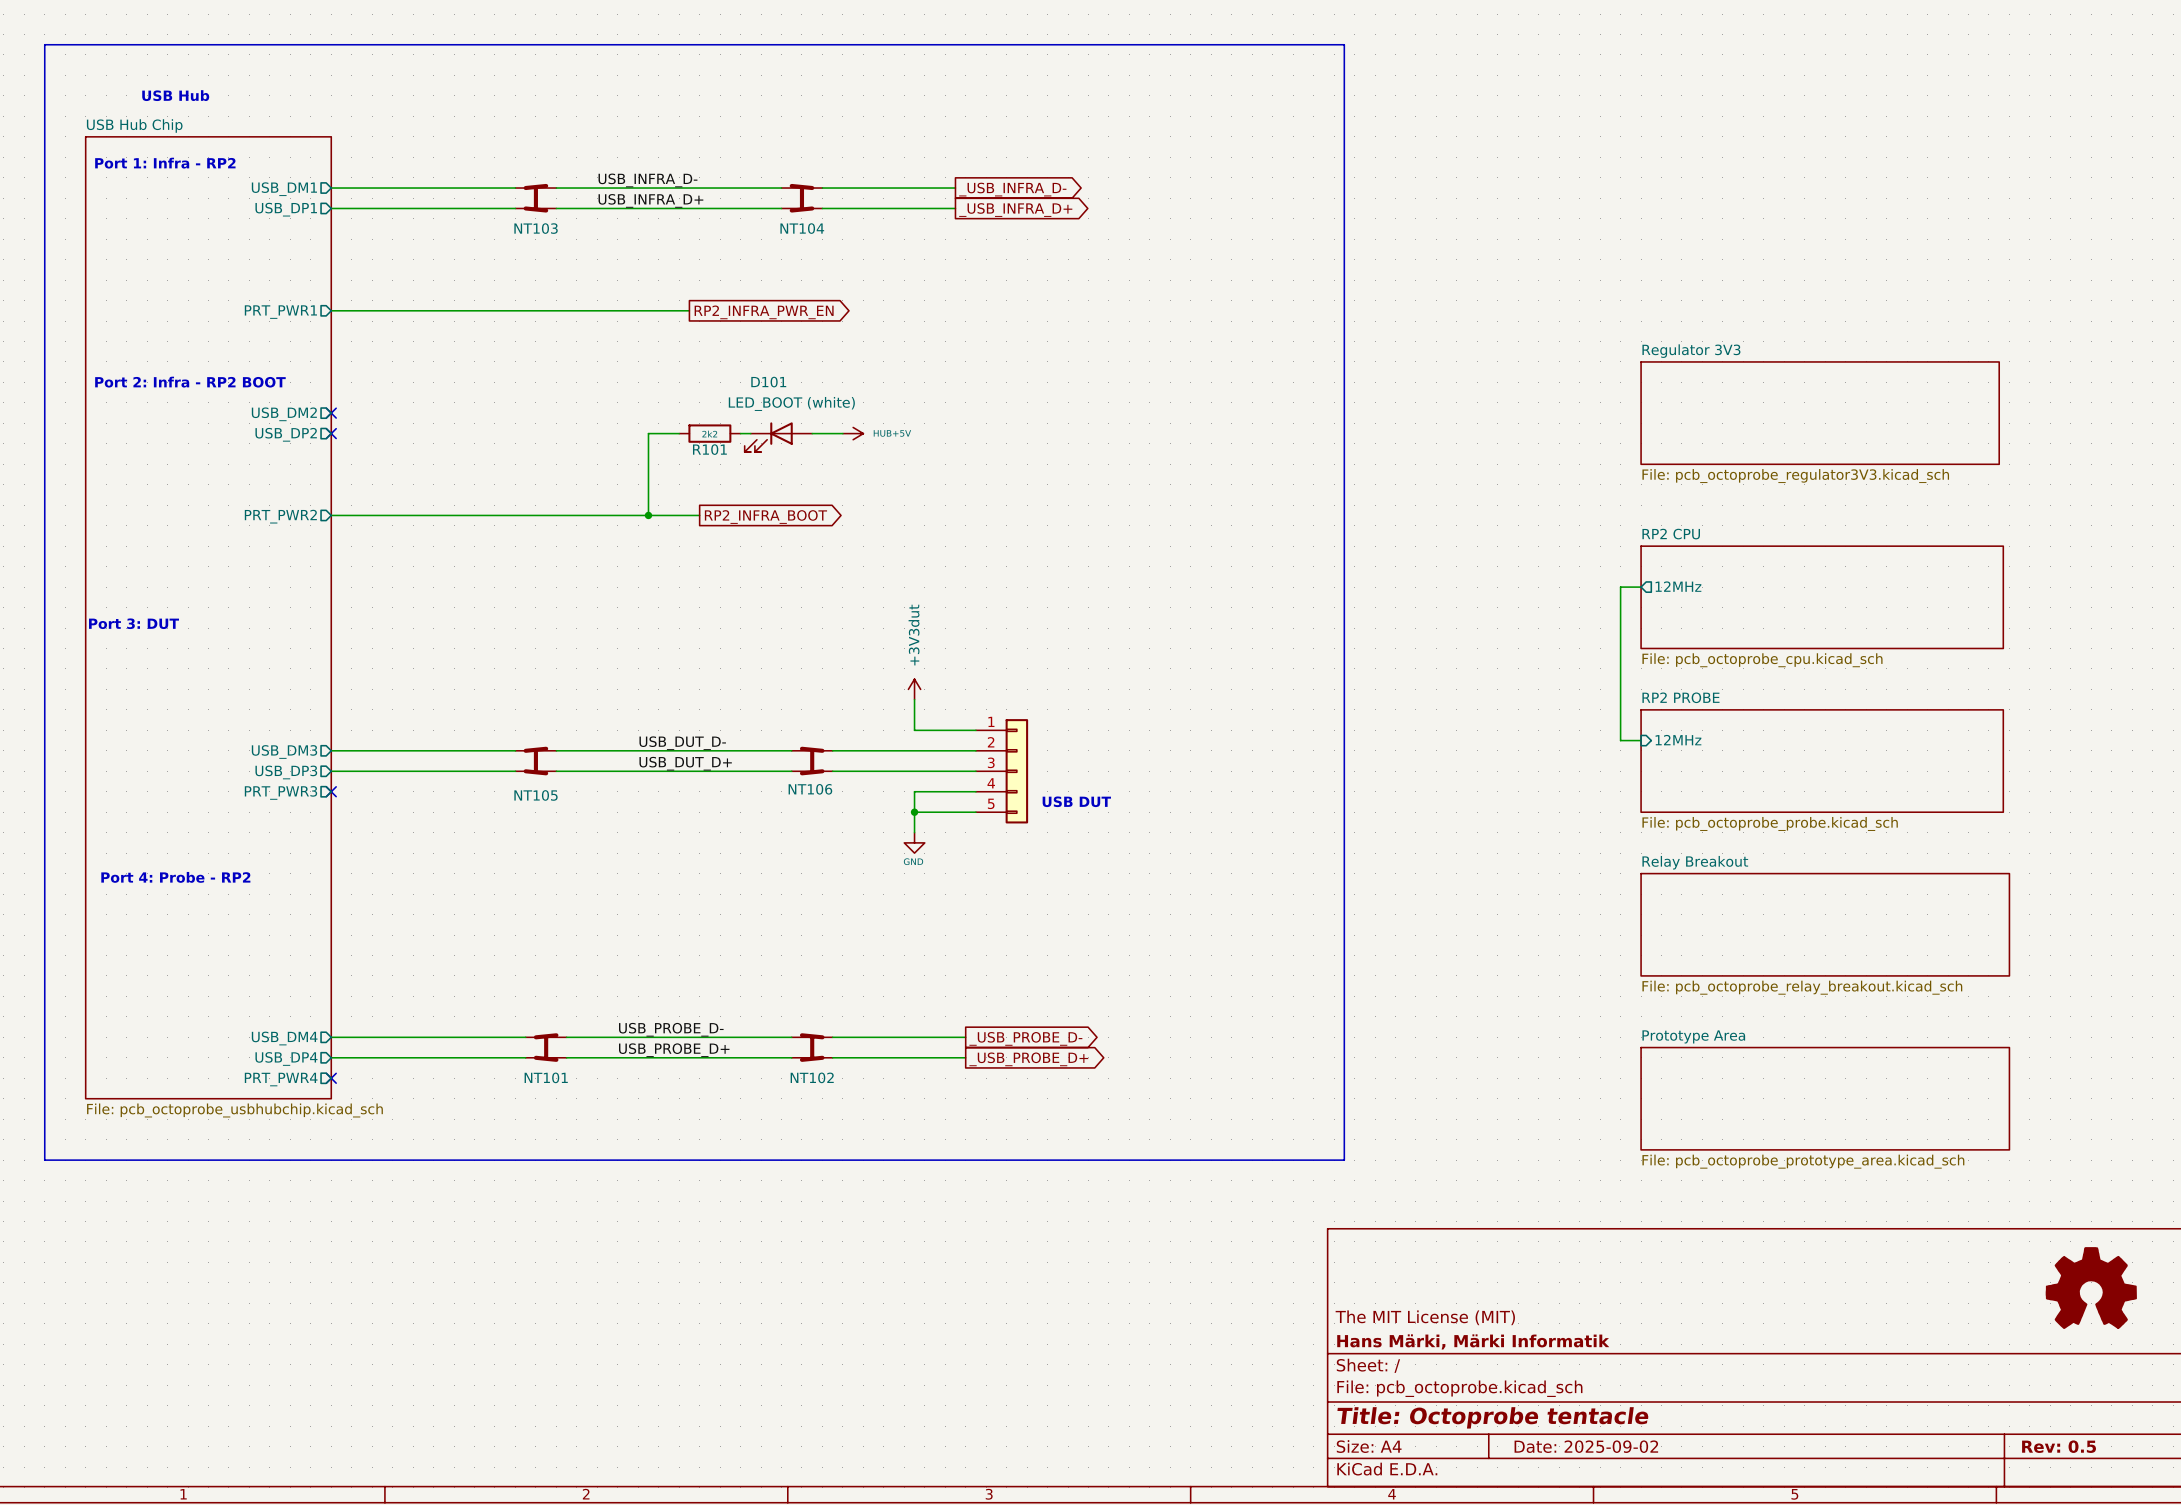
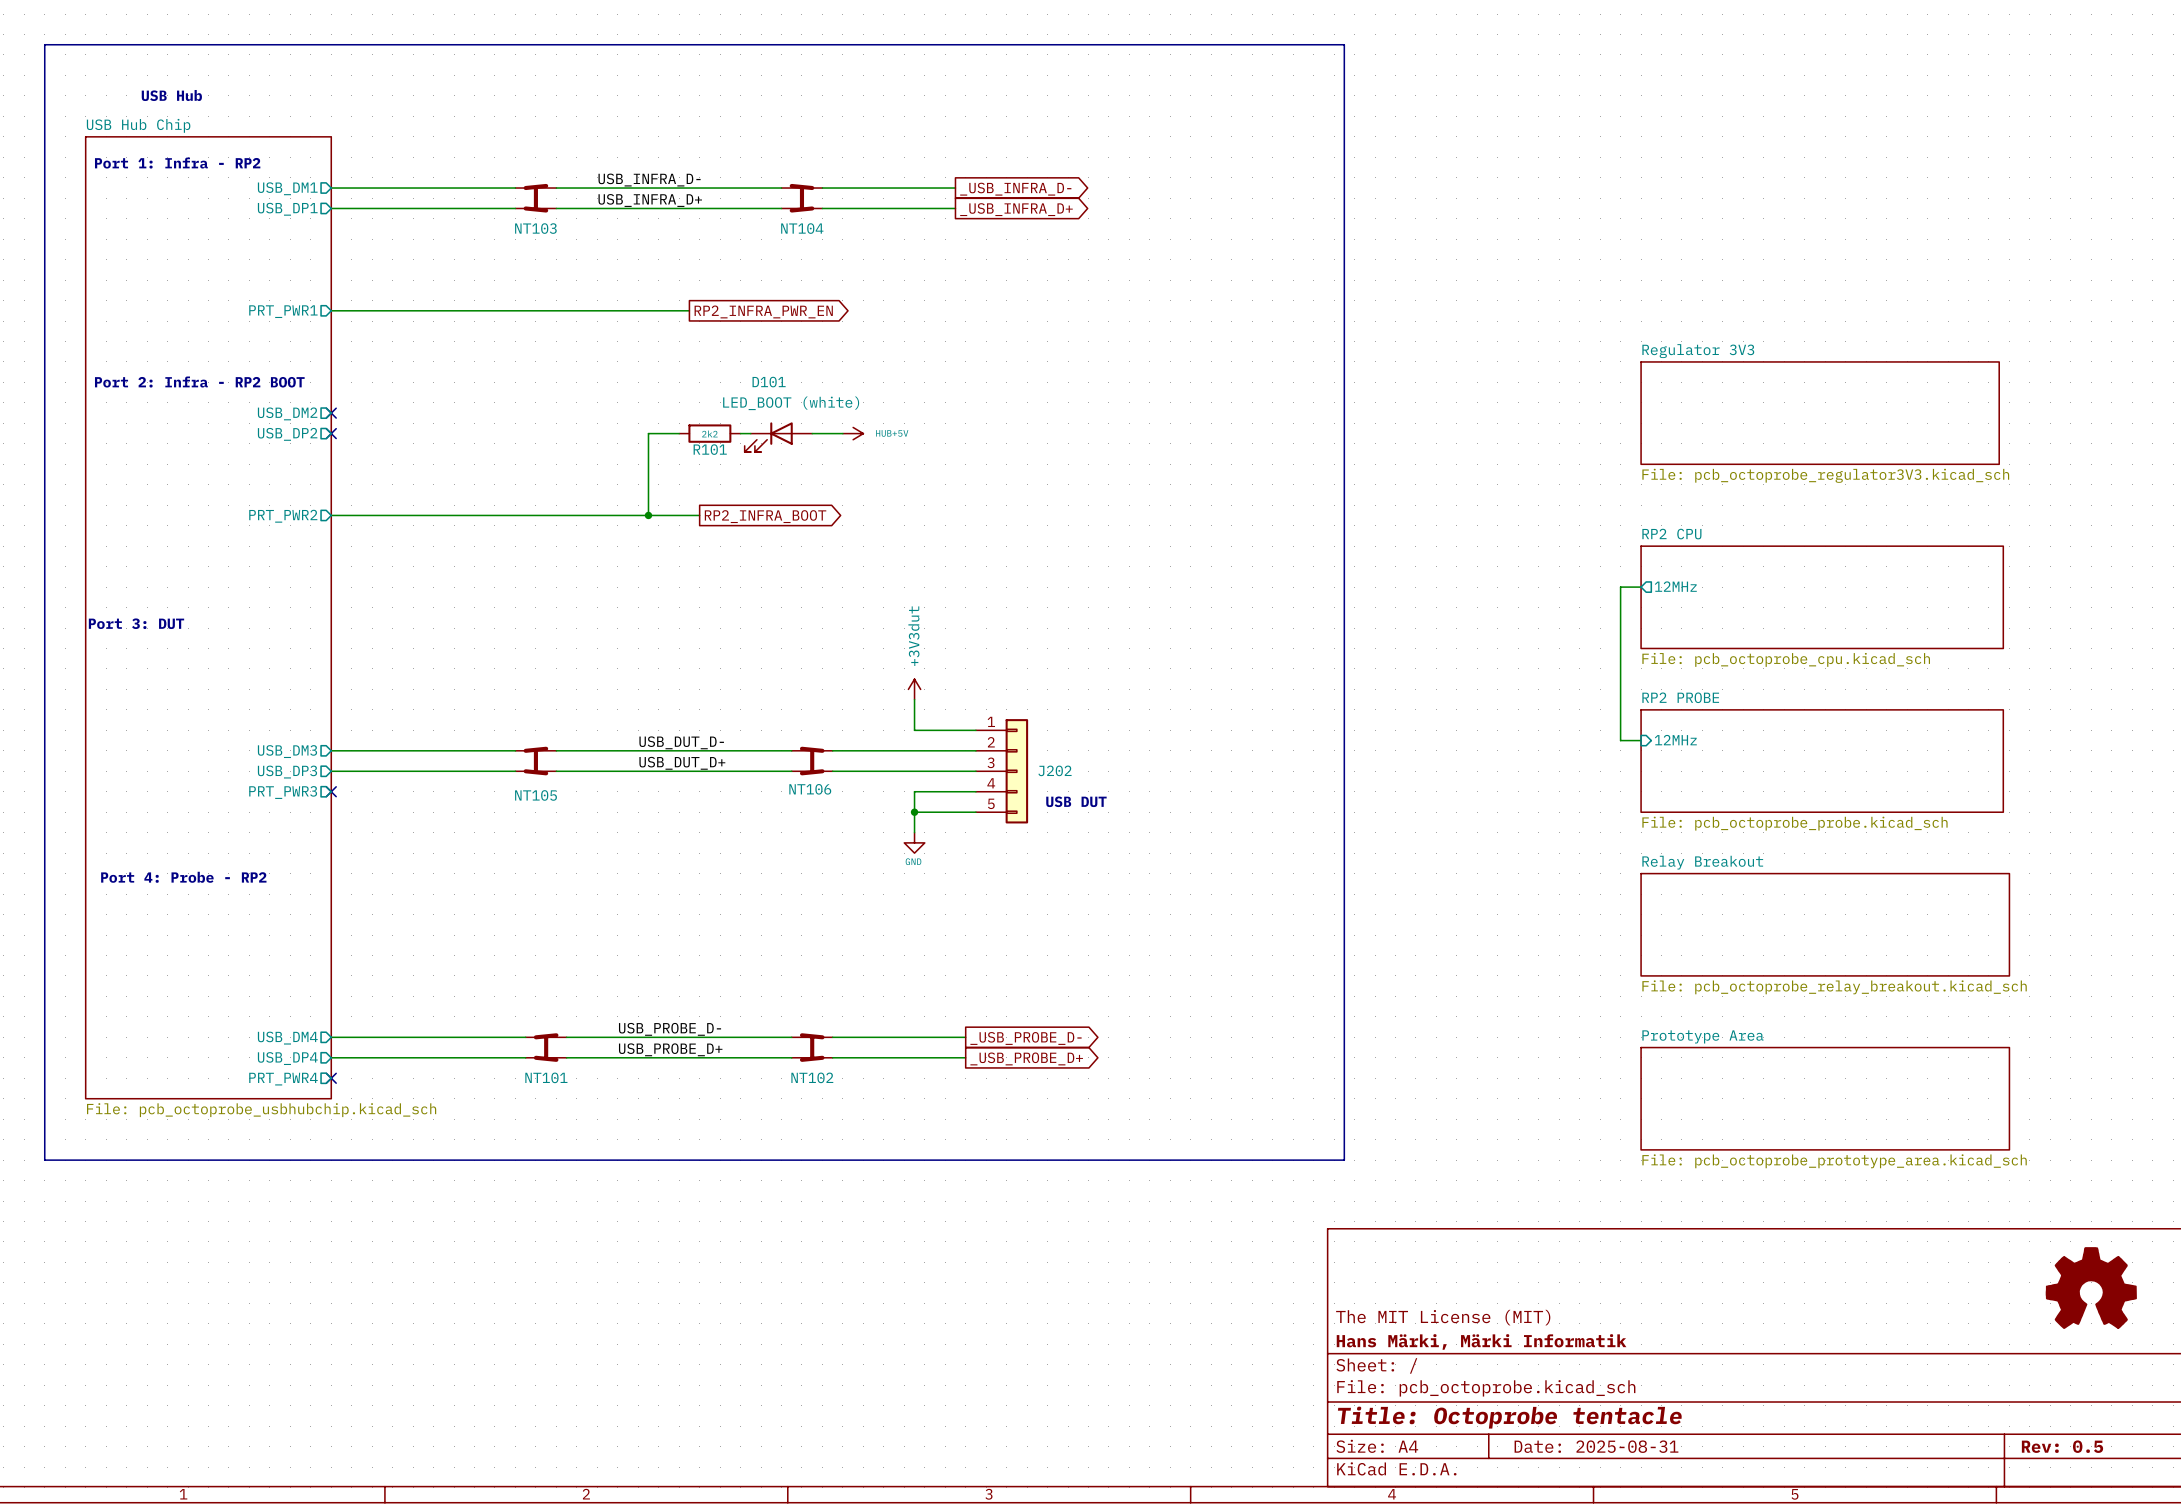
J202 name: none -> J202 (1055, 770)
title block: Date: 2025-09-02 (1586, 1446) -> Date: 2025-08-31 (1596, 1446)

